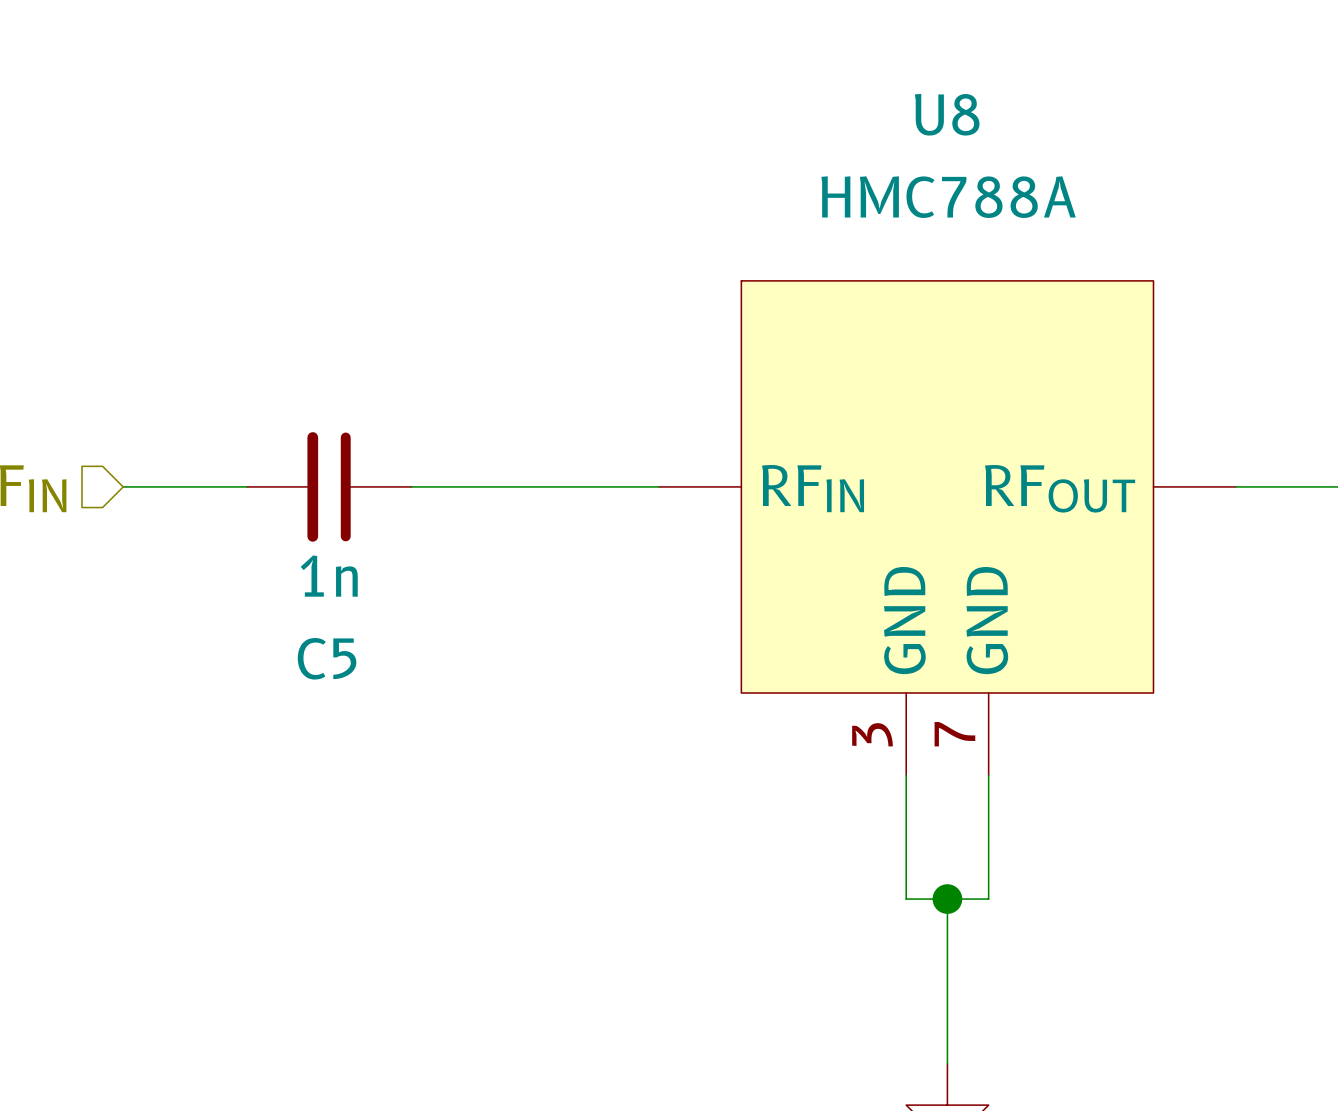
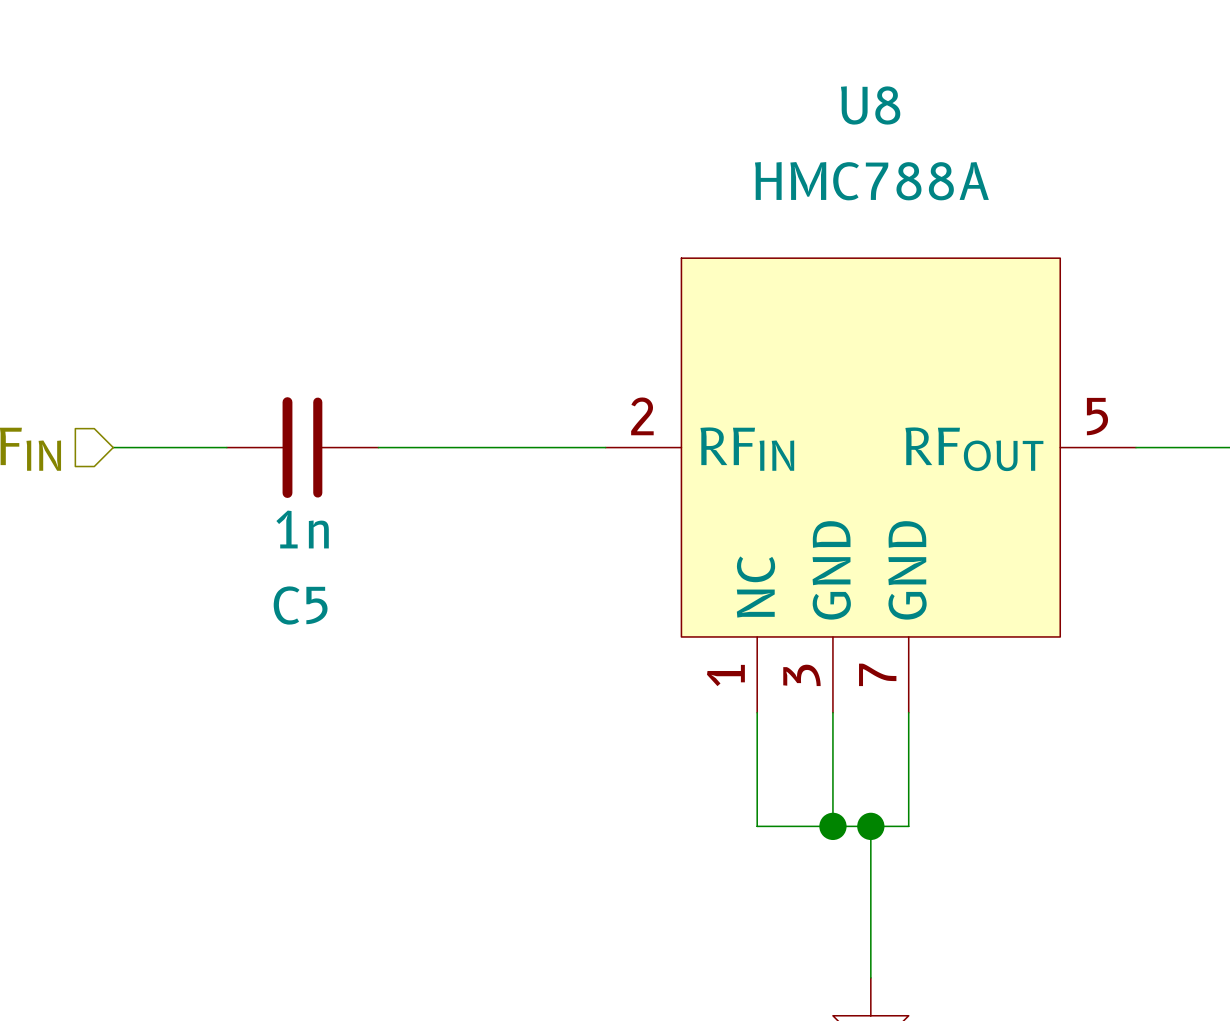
U8 symbol: [658, 280, 1236, 776] -> [605, 258, 1136, 713]
wire: none -> (757, 712) (757, 826) (832, 826)
junction: none -> (832, 826)

